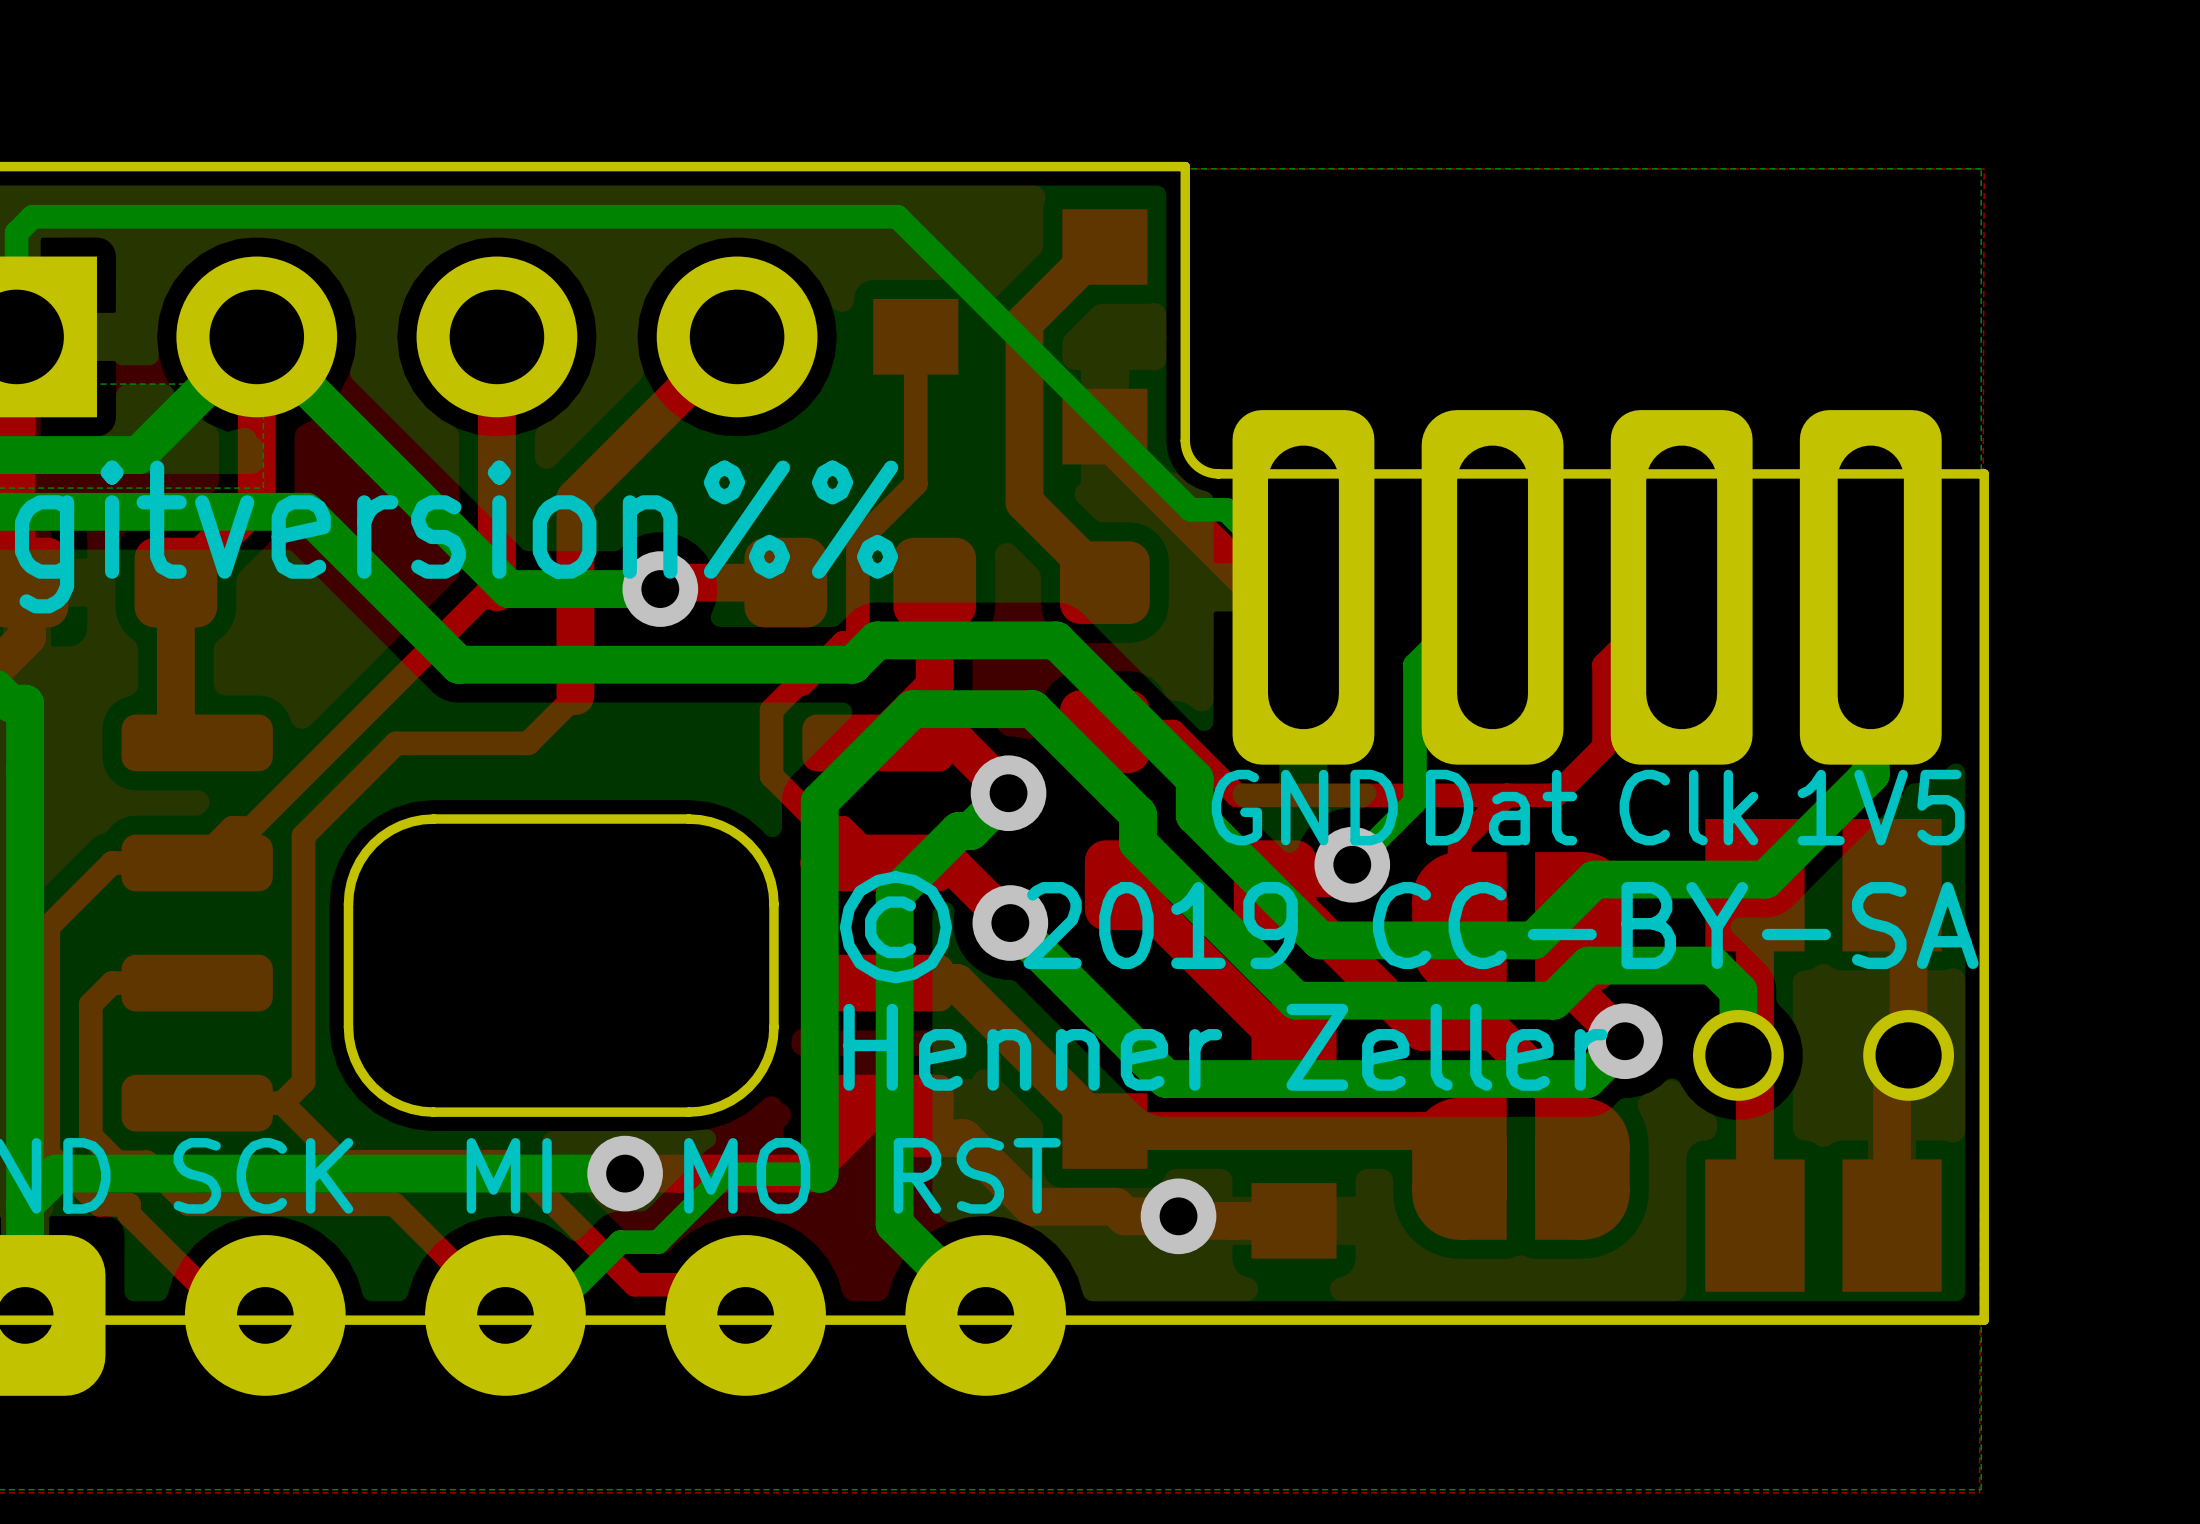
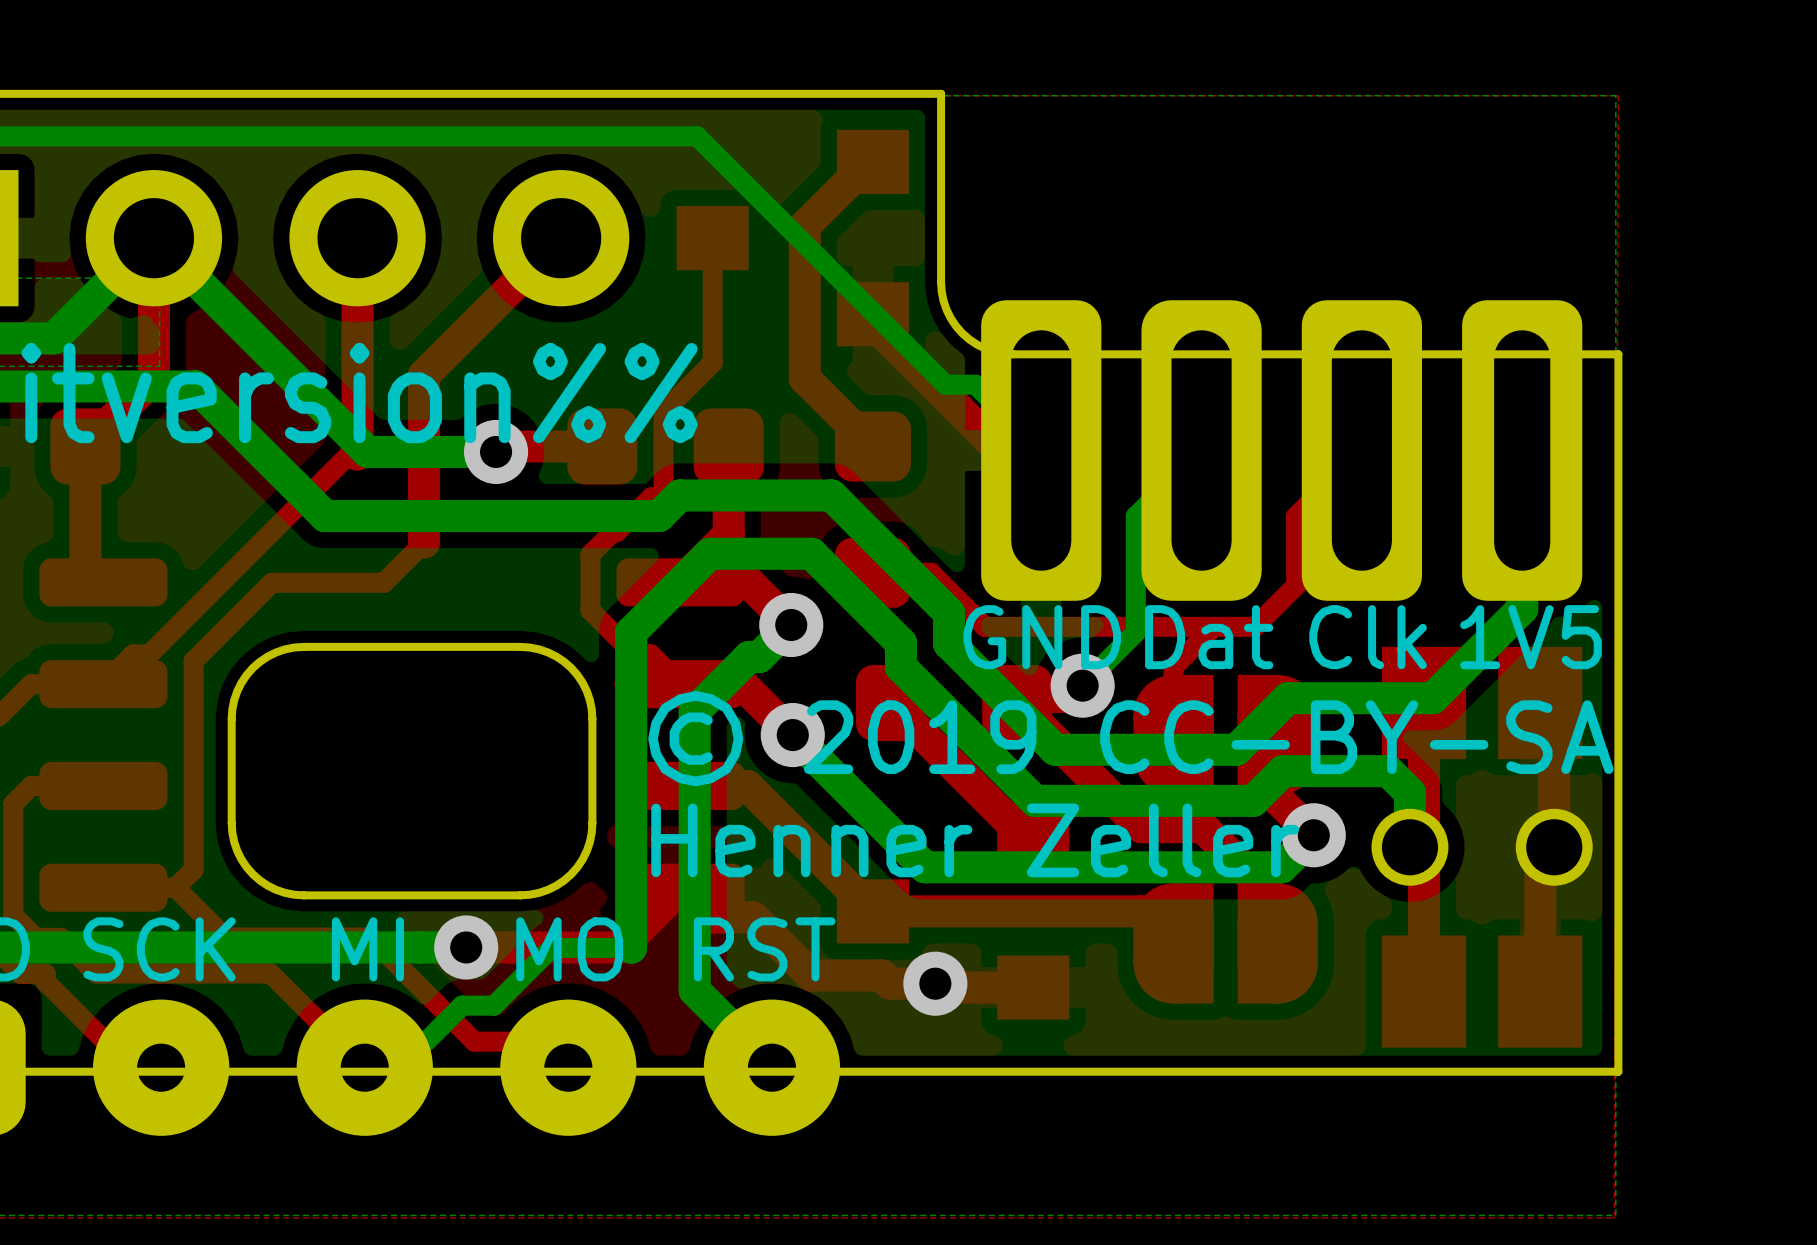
board edge: (1185, 388) (1185, 445) (1187, 453) (1194, 464) (1205, 471) (1214, 473) (1270, 473) -> (941, 282) (946, 309) (962, 333) (985, 348) (1013, 354)

